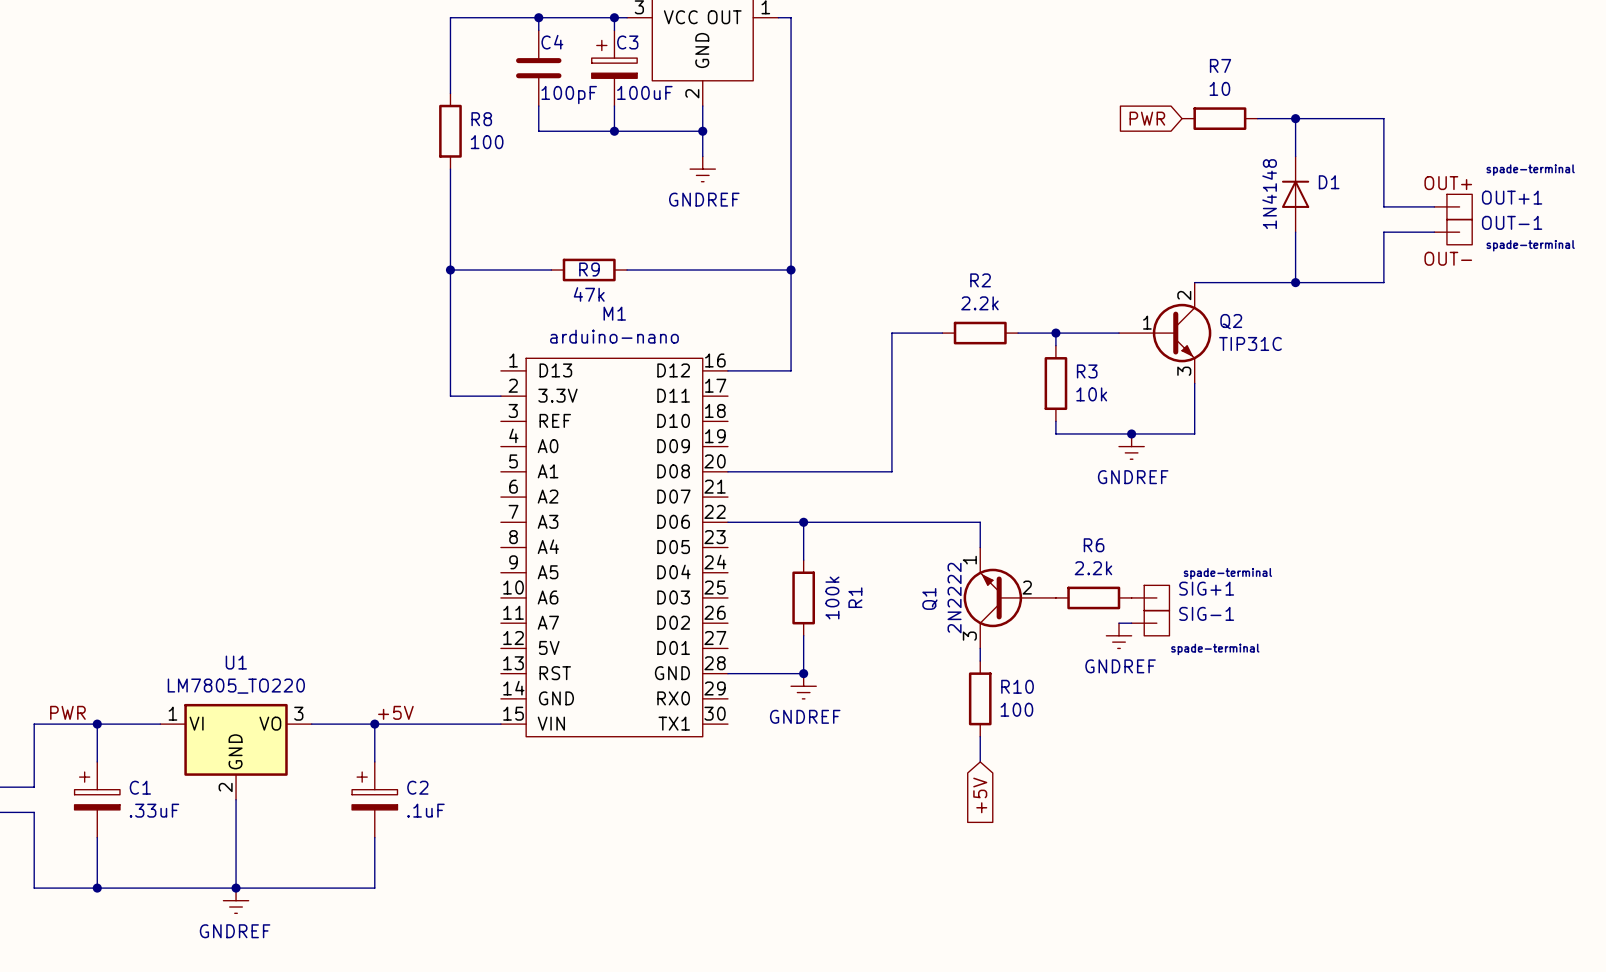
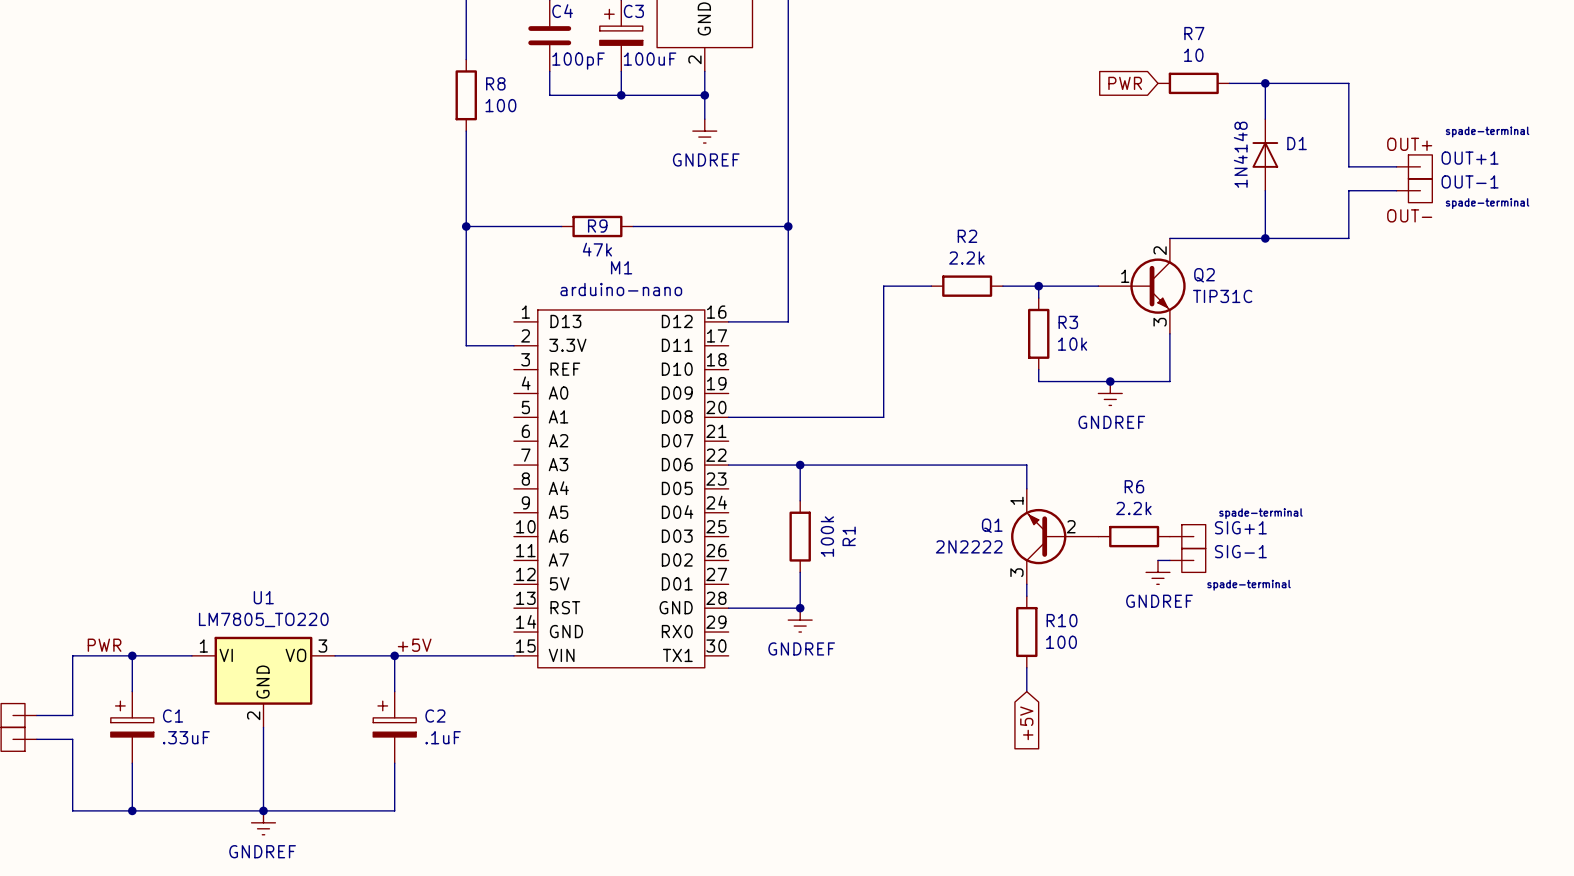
wire: (980, 522) (980, 547) -> (967, 465) (1026, 465) (1026, 488)
Q1 position: (1009, 597) -> (1054, 536)
R6 position: (1093, 597) -> (1134, 536)
SIG+1 position: (1150, 597) -> (1187, 536)
Q1 name rotation: 0° (929, 598) -> 90° clockwise (992, 525)
Q1 value rotation: 0° (954, 598) -> 90° clockwise (969, 546)
wire: (1119, 623) (1131, 623) -> (1157, 560) (1169, 560)
SIG-1 position: (1150, 623) -> (1187, 560)
power symbol position: GNDREF (1119, 635) -> GNDREF (1157, 572)
wire: (980, 648) (980, 661) -> (1026, 584) (1026, 596)
R10 position: (980, 698) -> (1026, 632)
wire: (980, 736) (980, 761) -> (1026, 667) (1026, 691)
global label position: +5V (980, 795) -> +5V (1026, 723)

